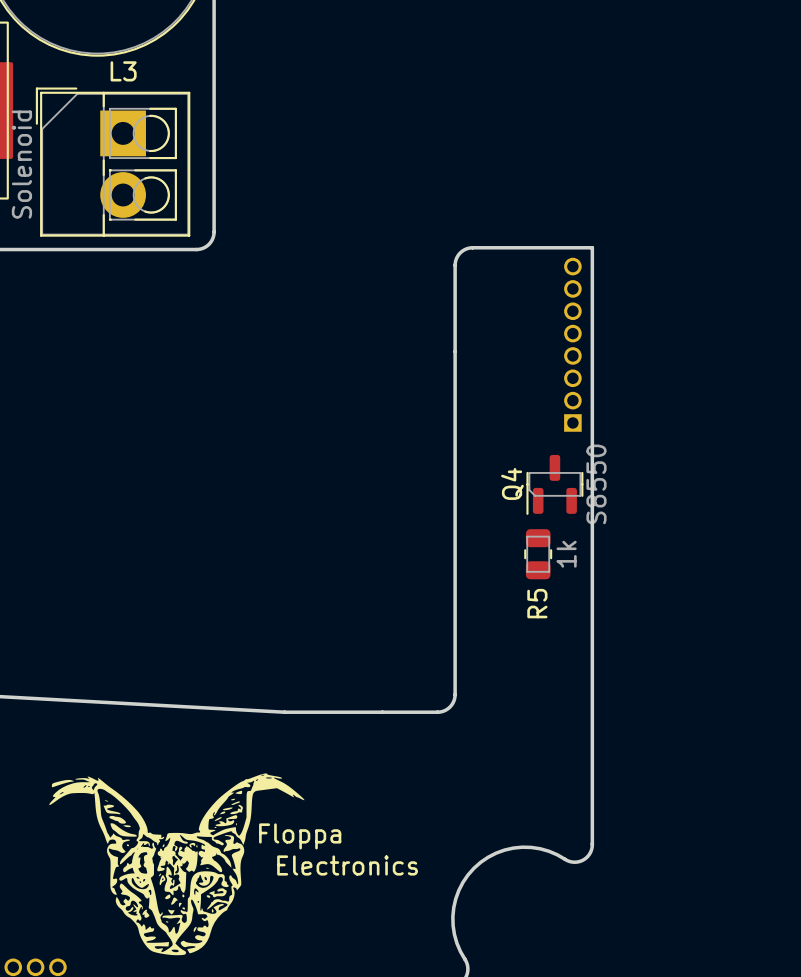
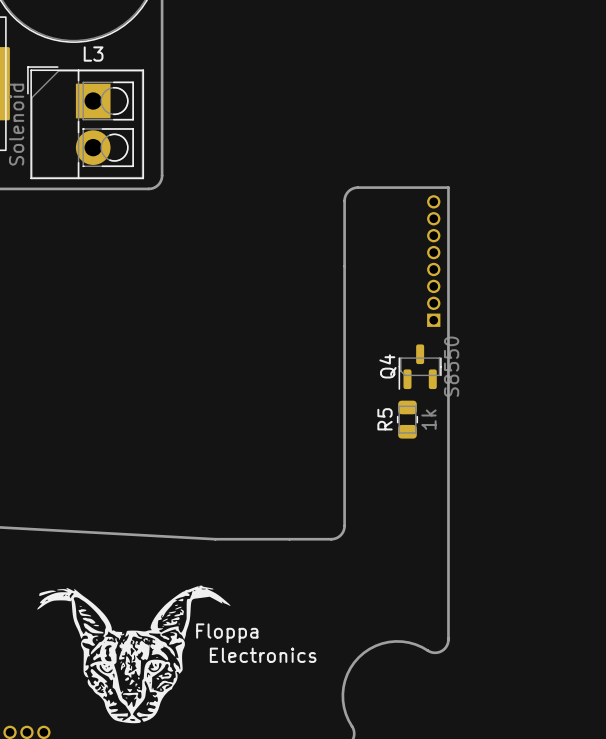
R5 name position: R5 (537, 603) -> R5 (385, 419)

